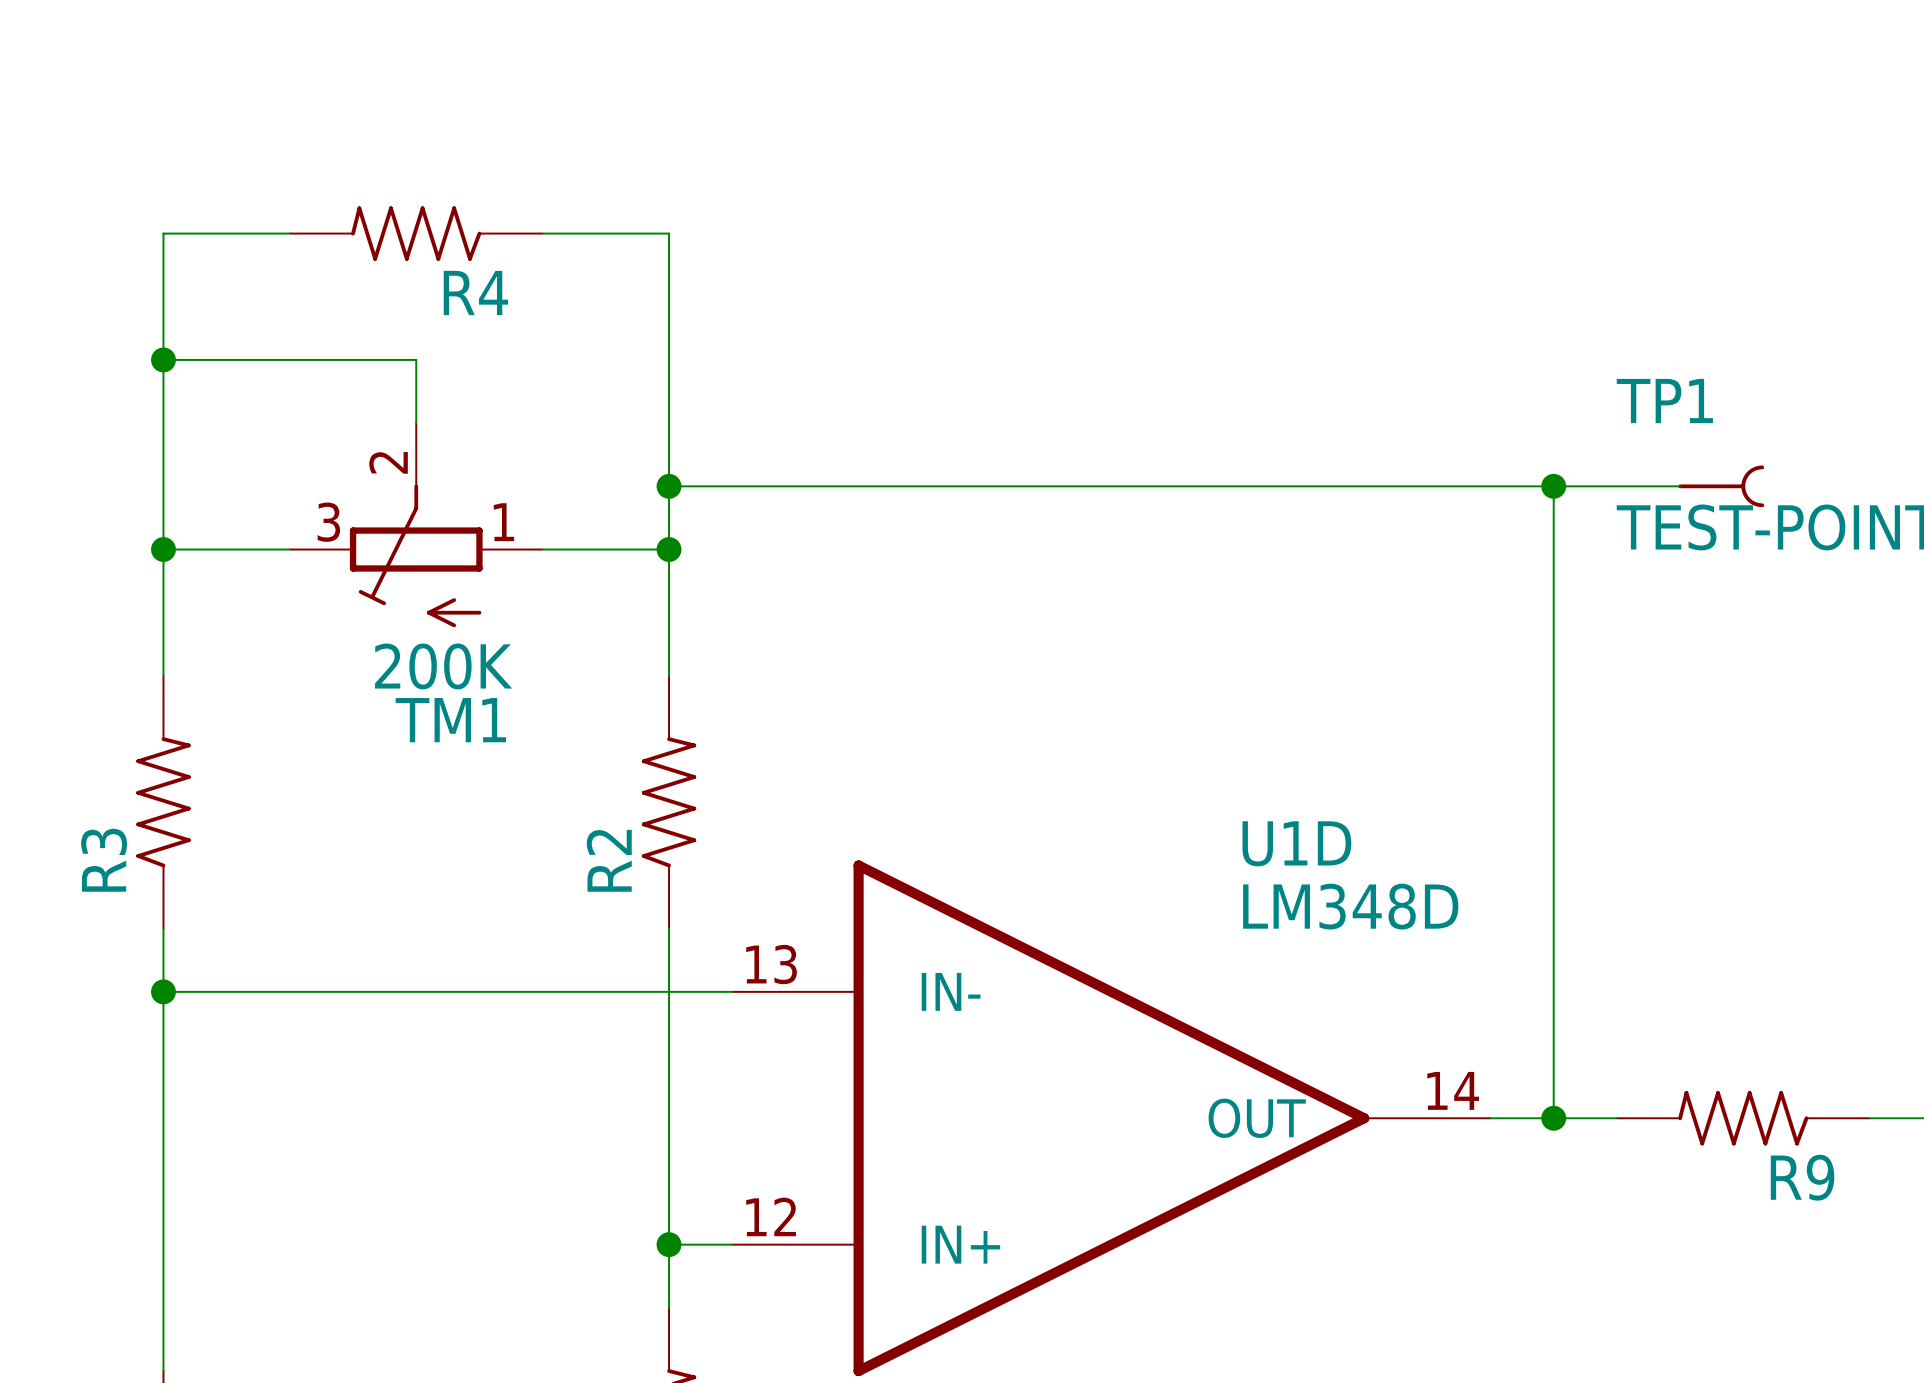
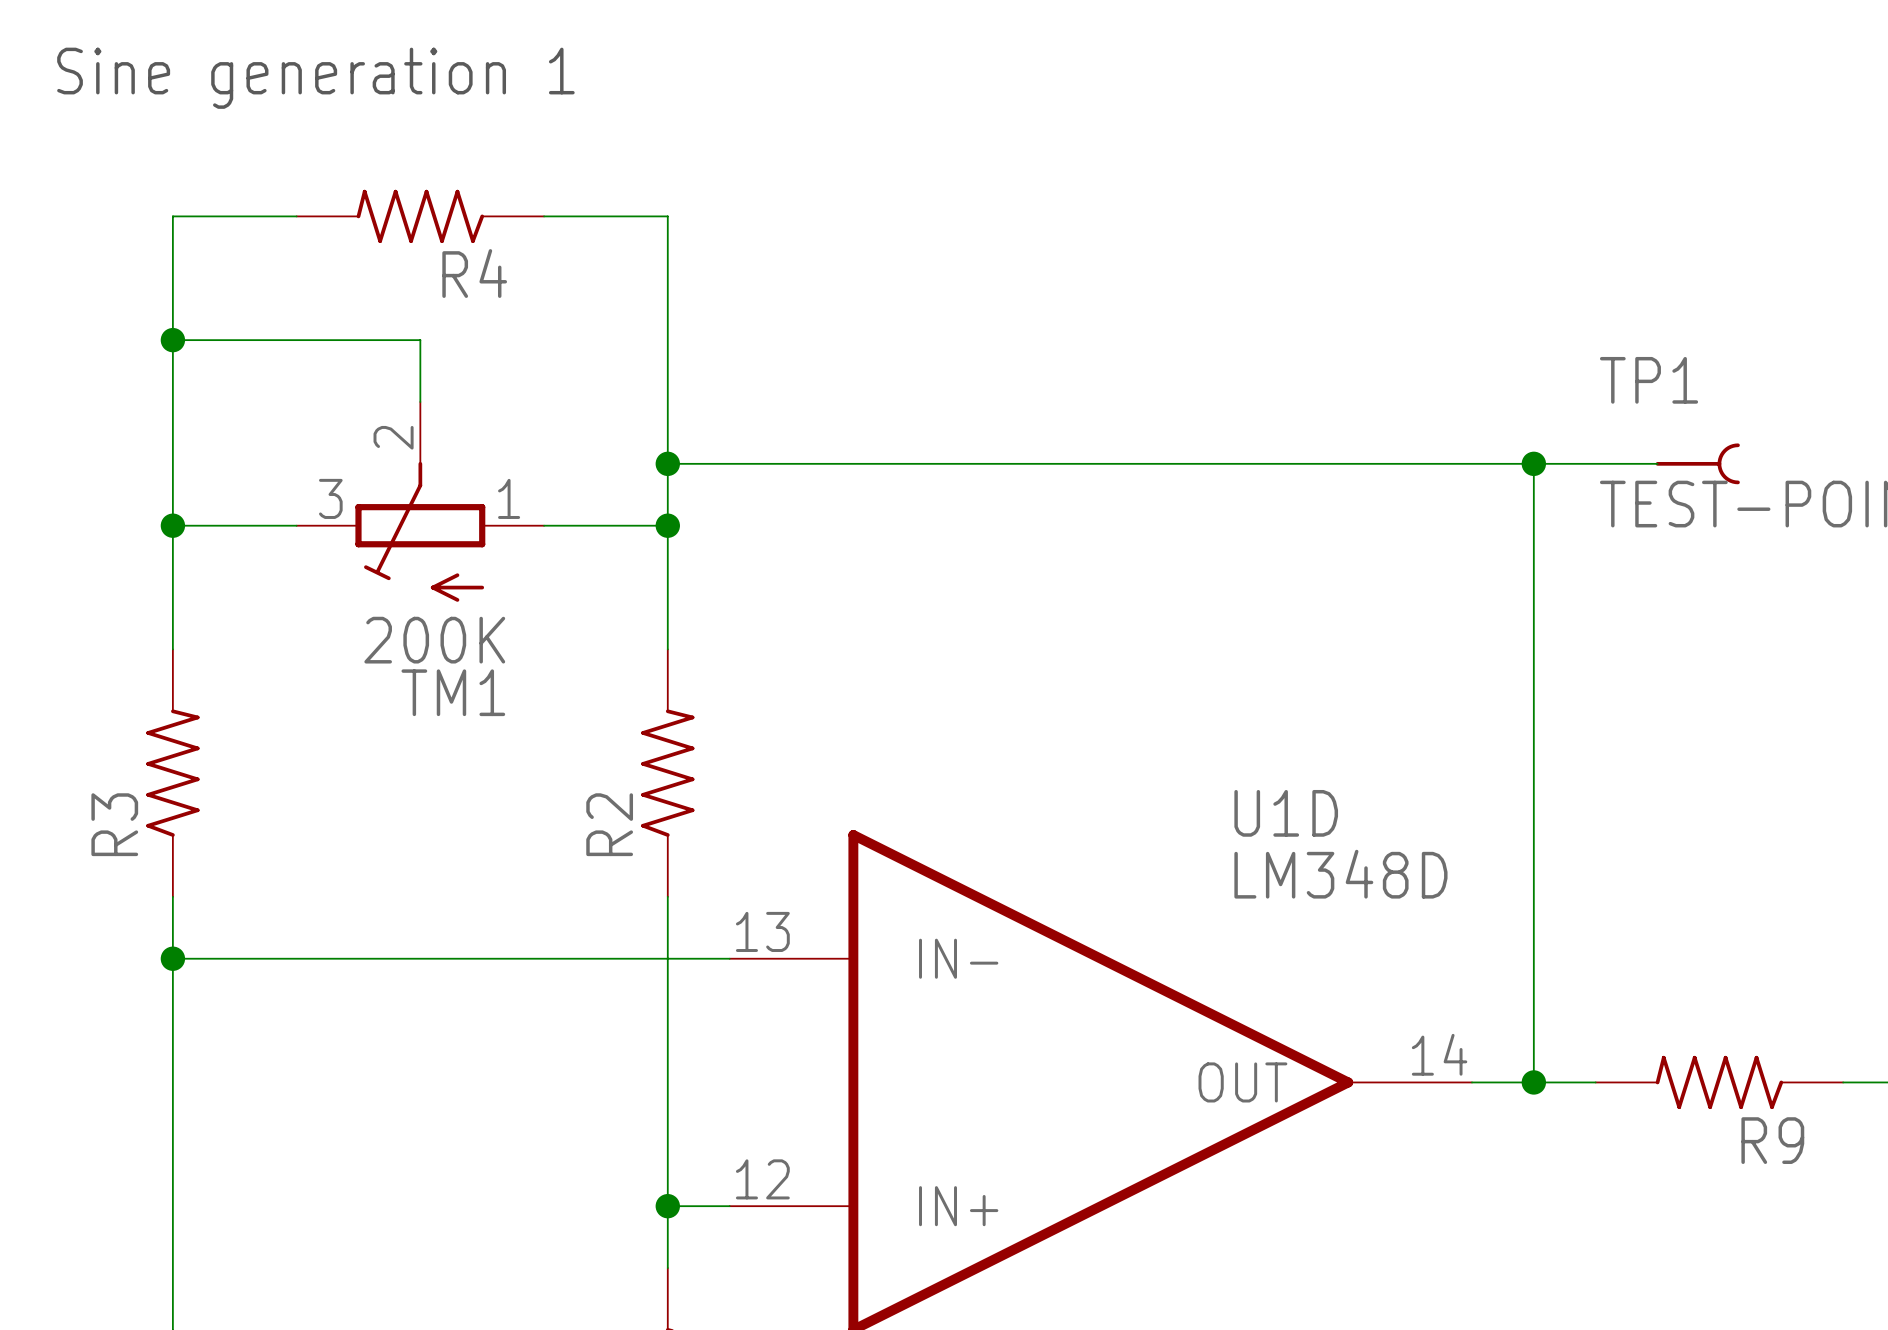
text: none -> Sine generation 1 (315, 78)

